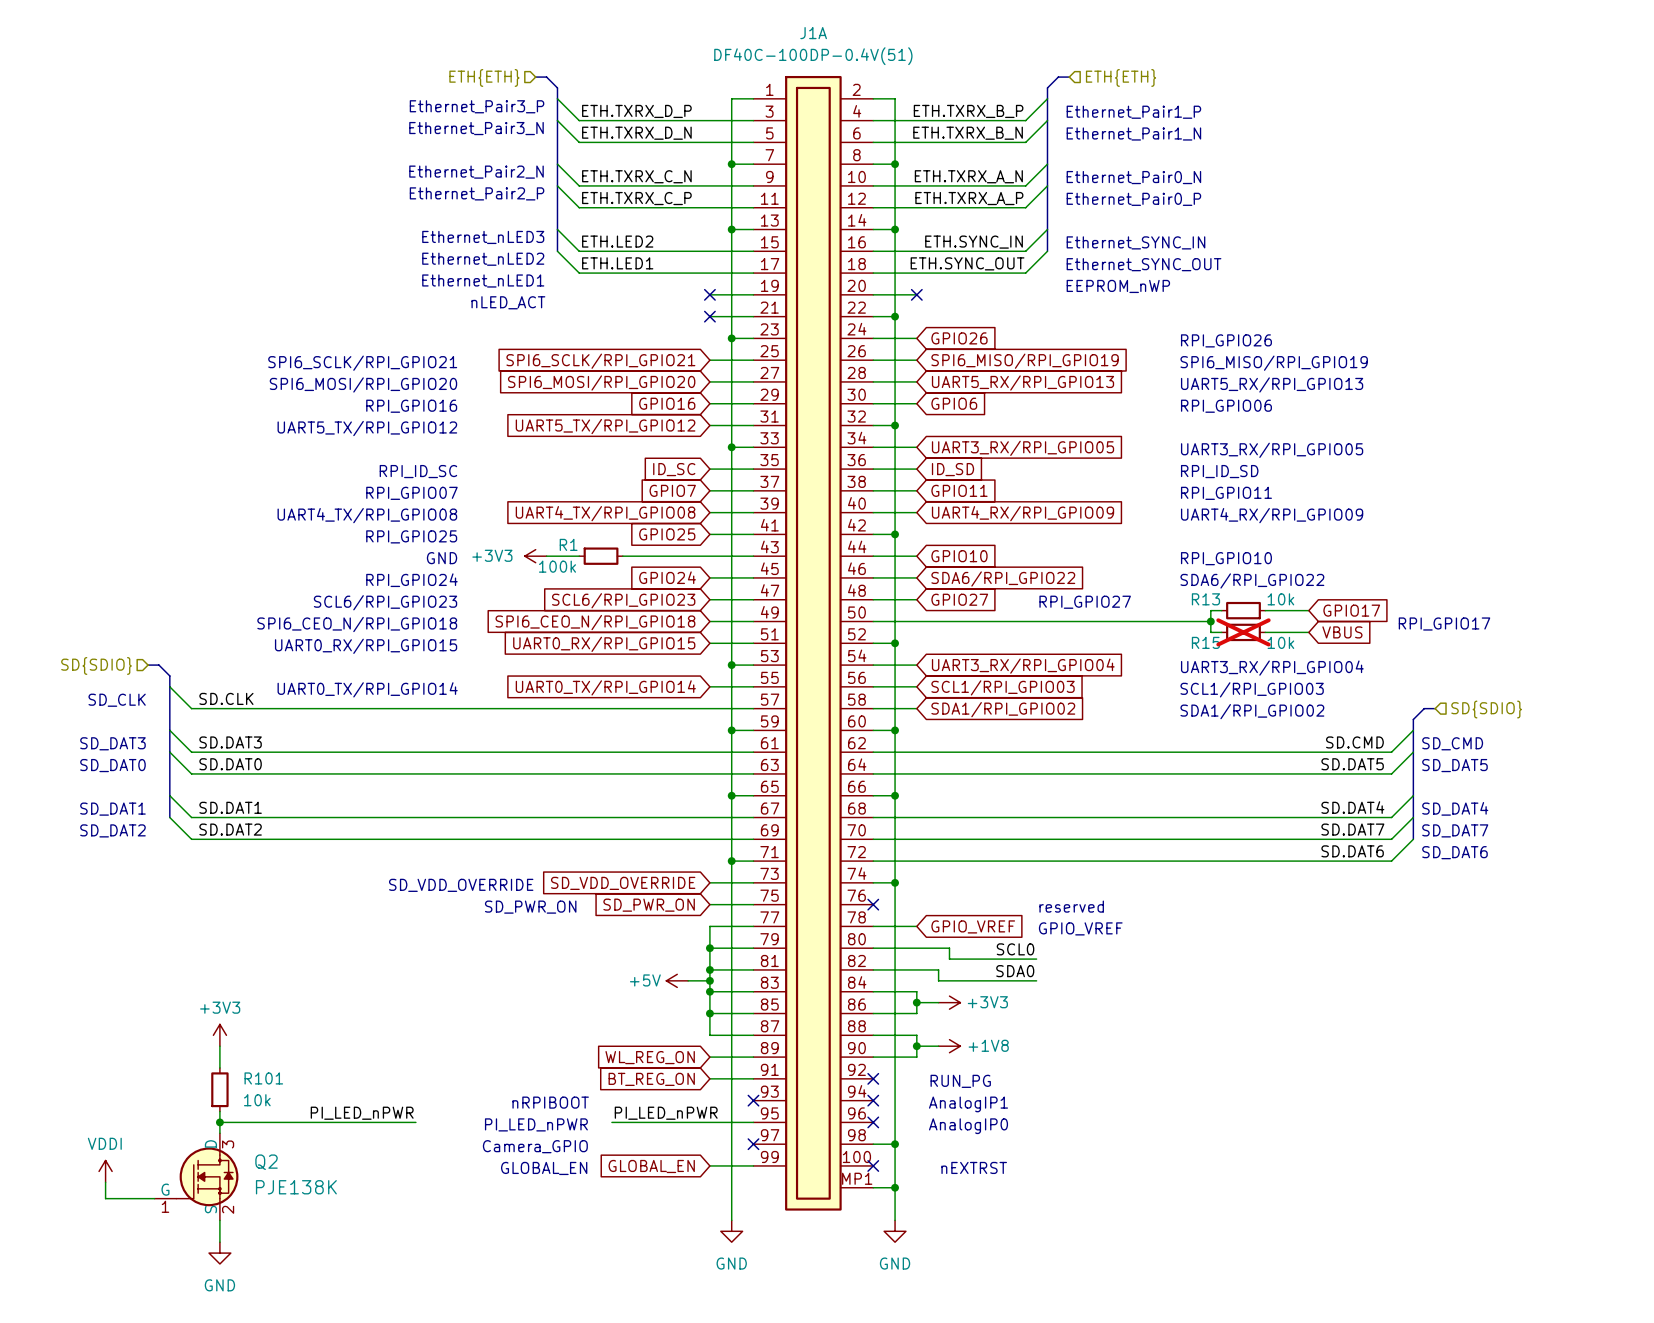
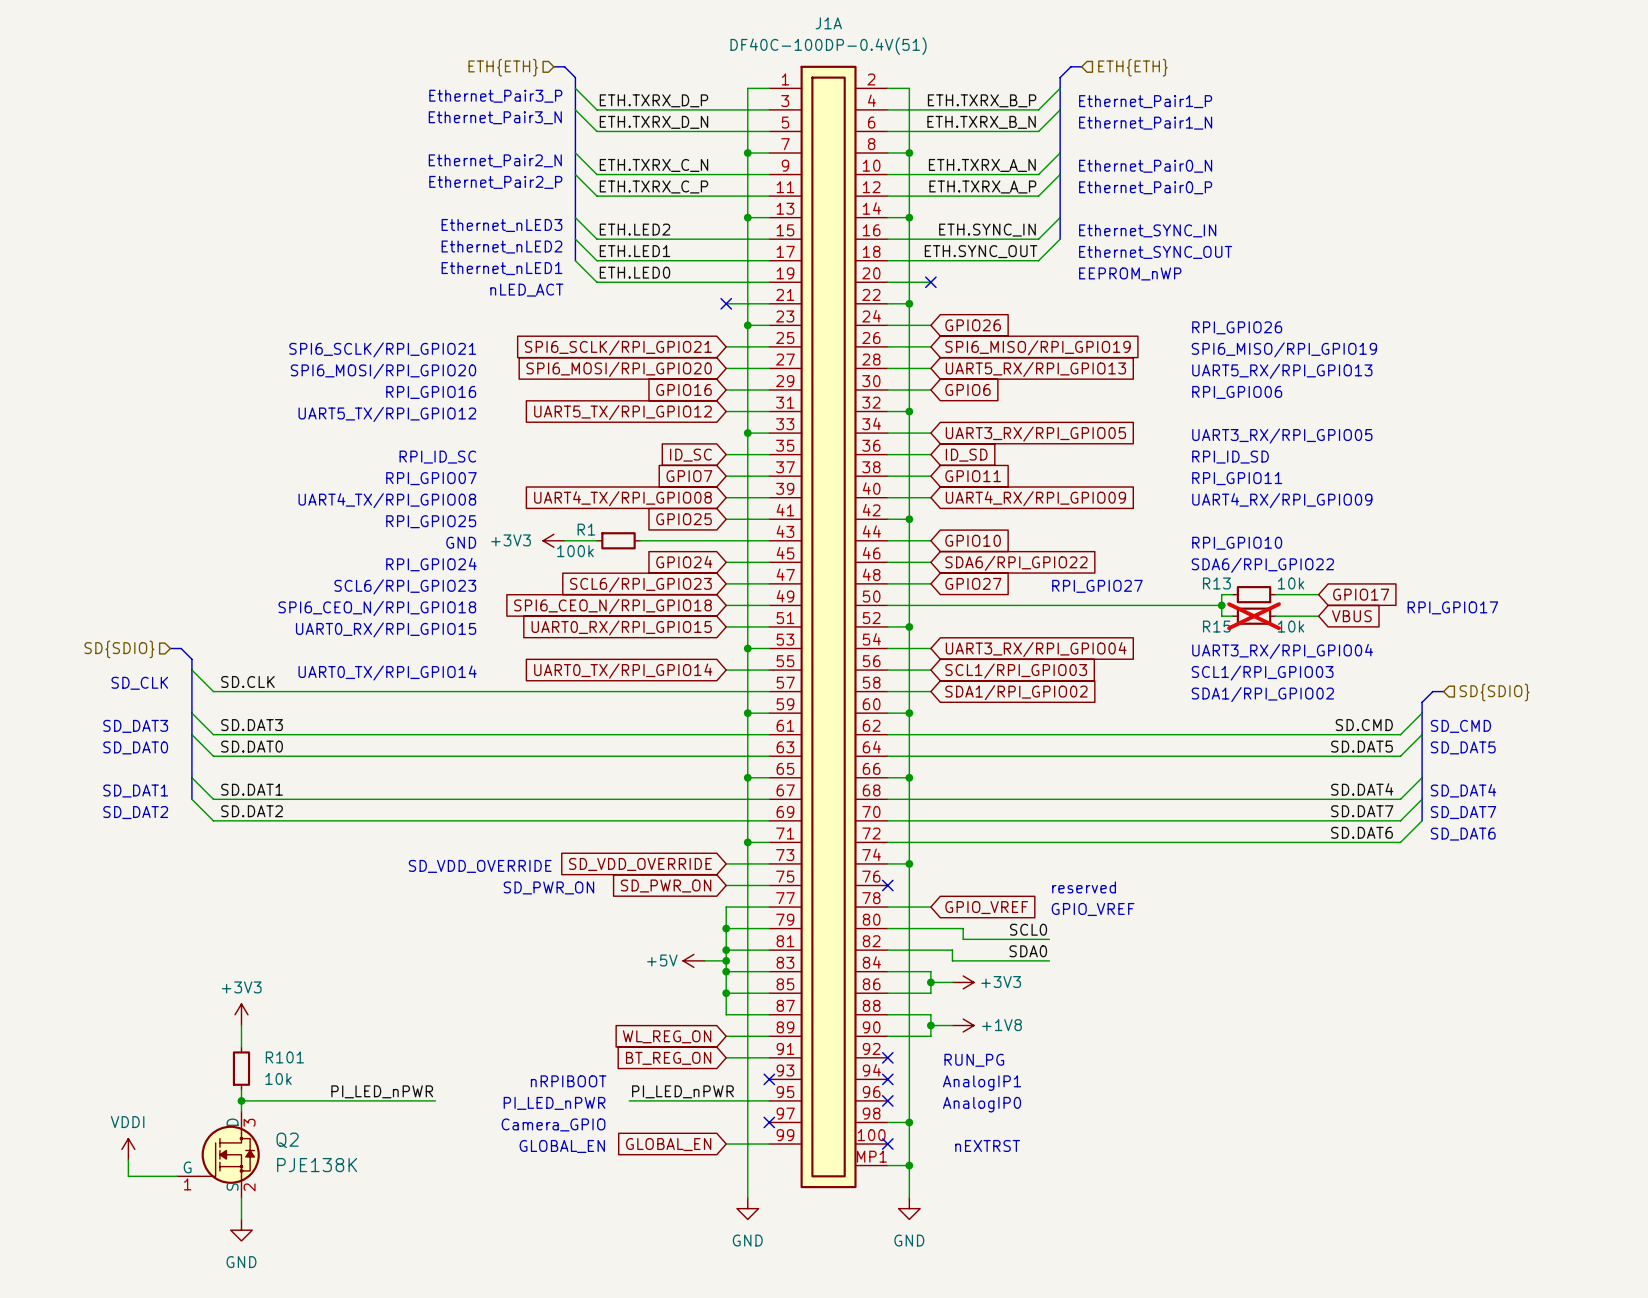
bus: none -> (575, 239) (575, 260)
wire: none -> (575, 260) (596, 282) (726, 282)
label: none -> ETH.LED0 (634, 272)
no-connect mark: (709, 294) -> none

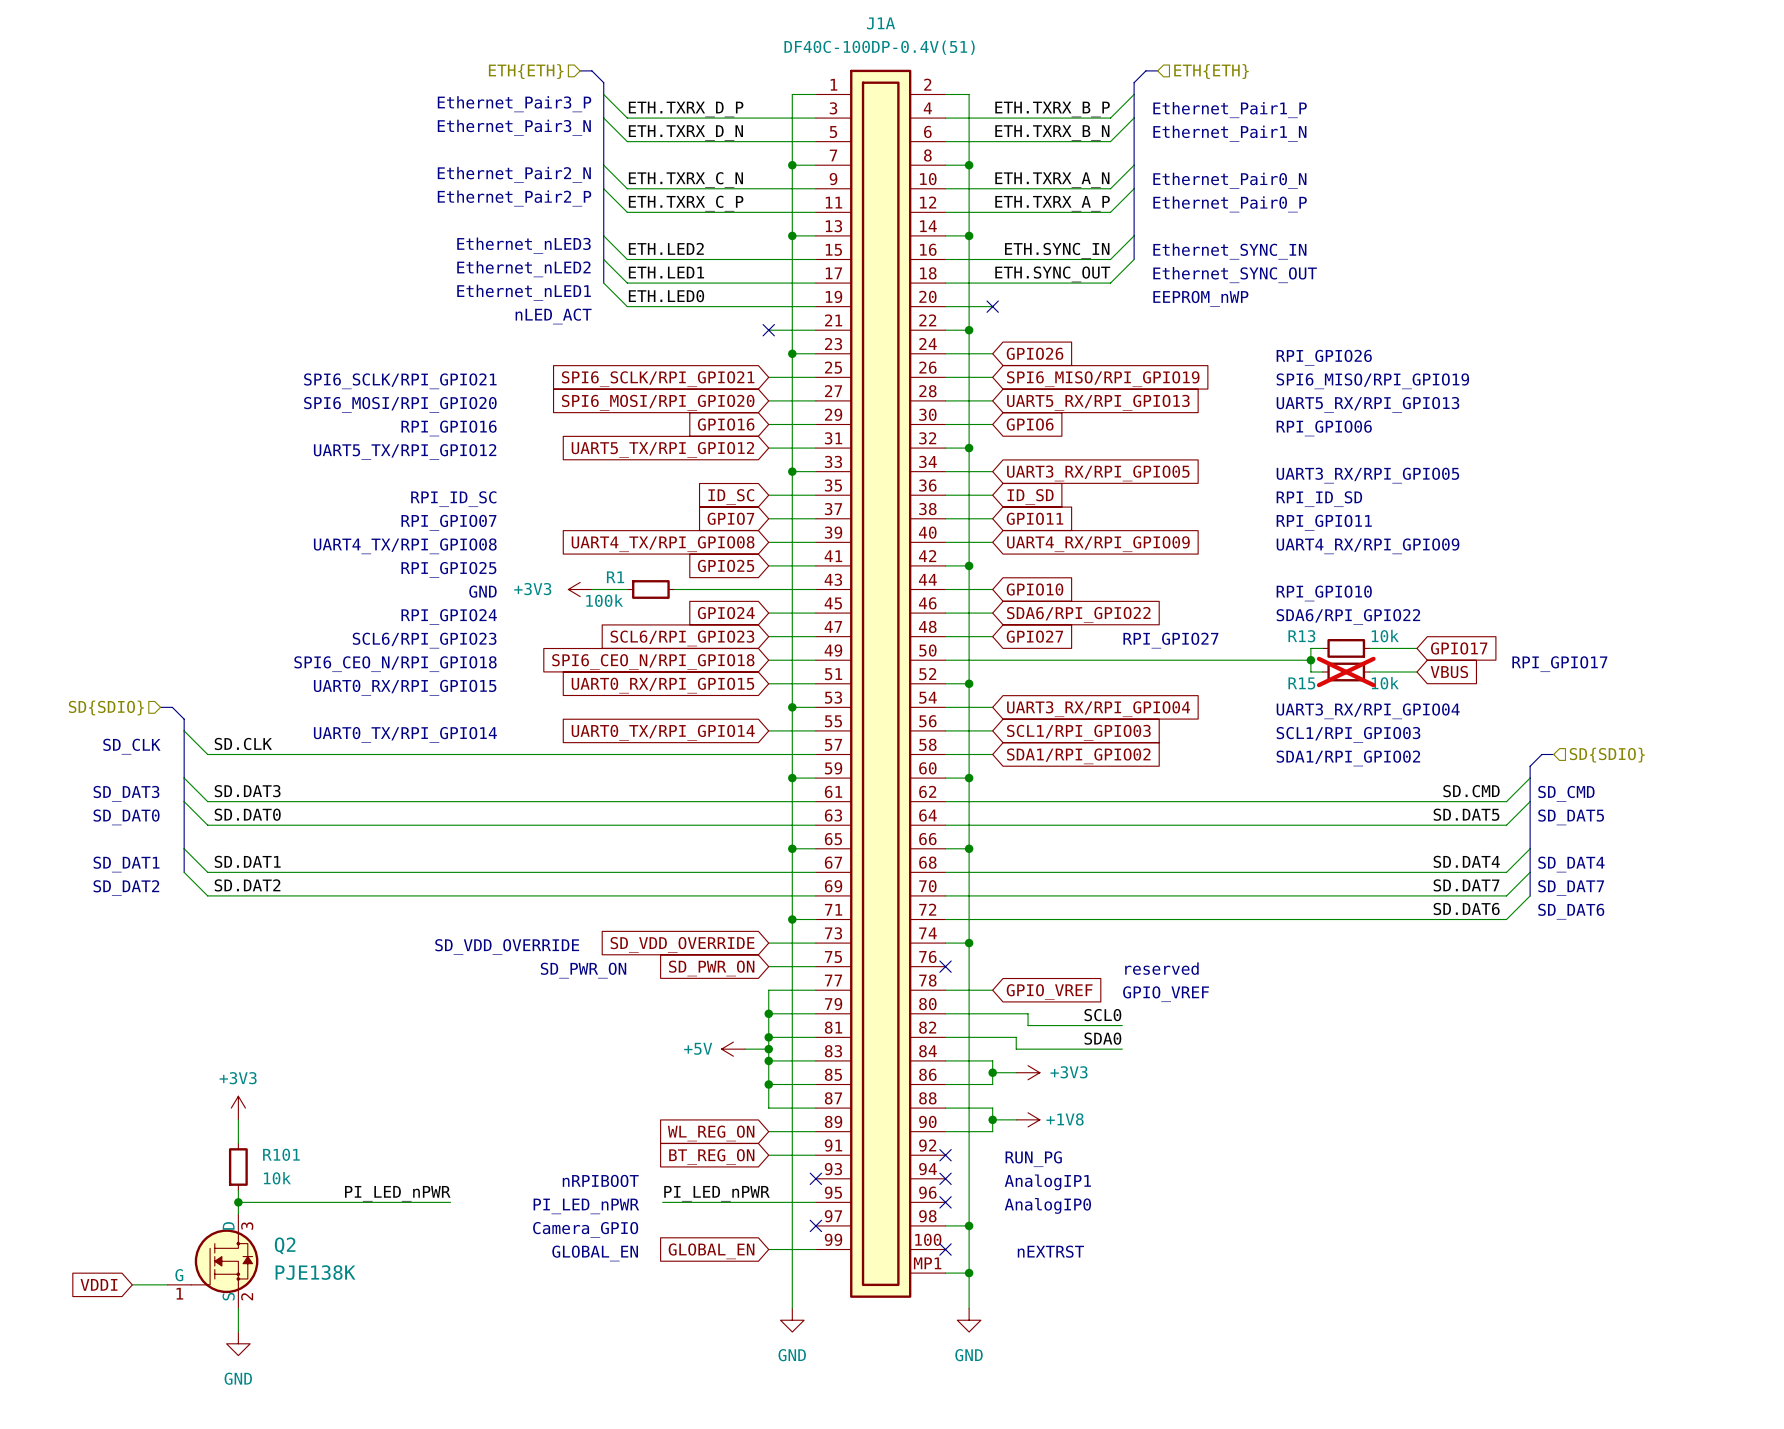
power symbol: VDDI (128, 1149) -> none
wire: (128, 1160) (128, 1176) (144, 1176) -> none
global label: none -> VDDI (99, 1284)

